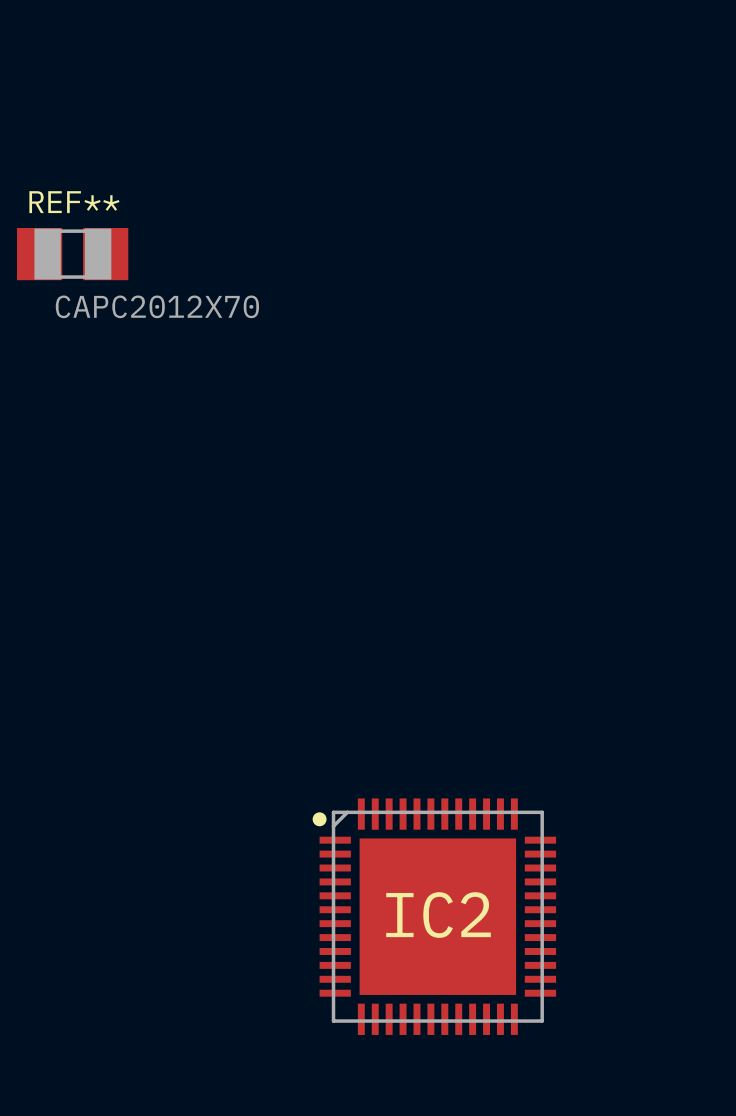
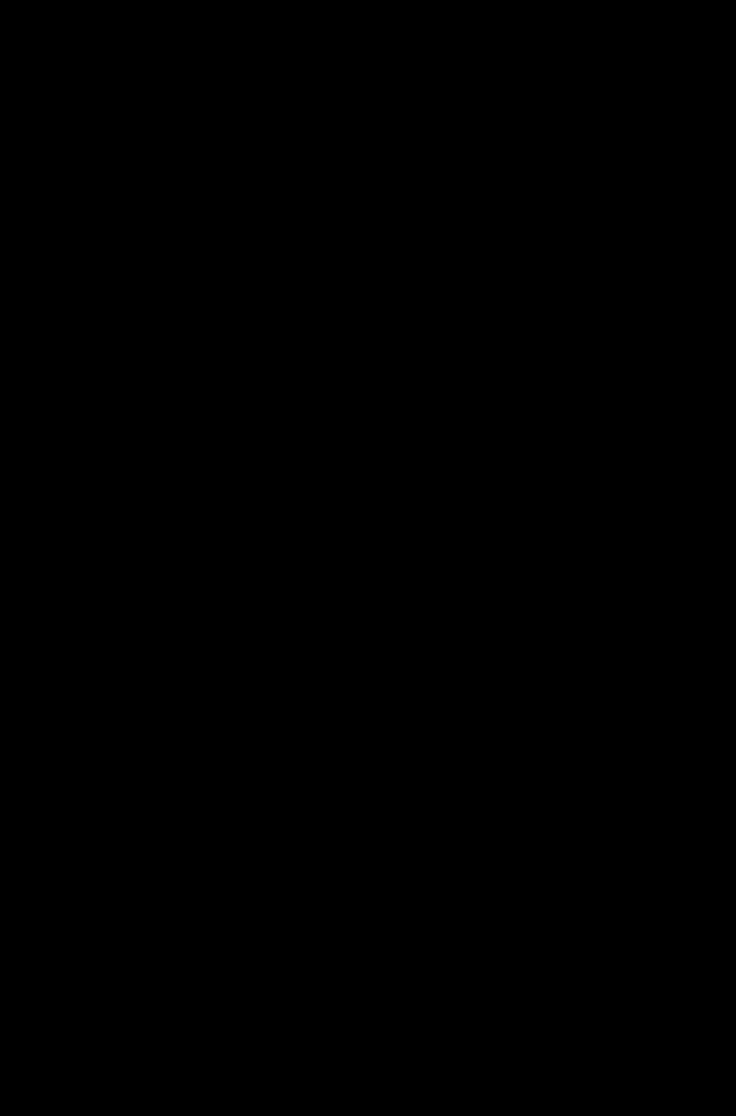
REF**: CAPC2012X70 (72, 254) -> none
IC2: (434, 916) -> none

